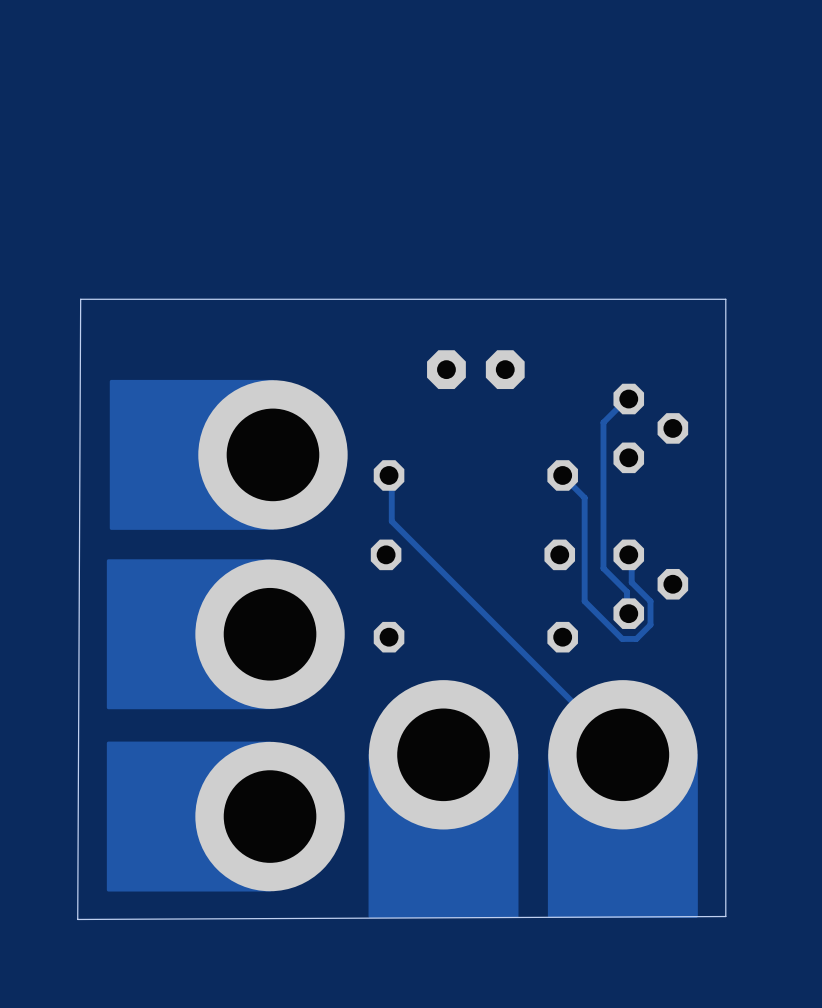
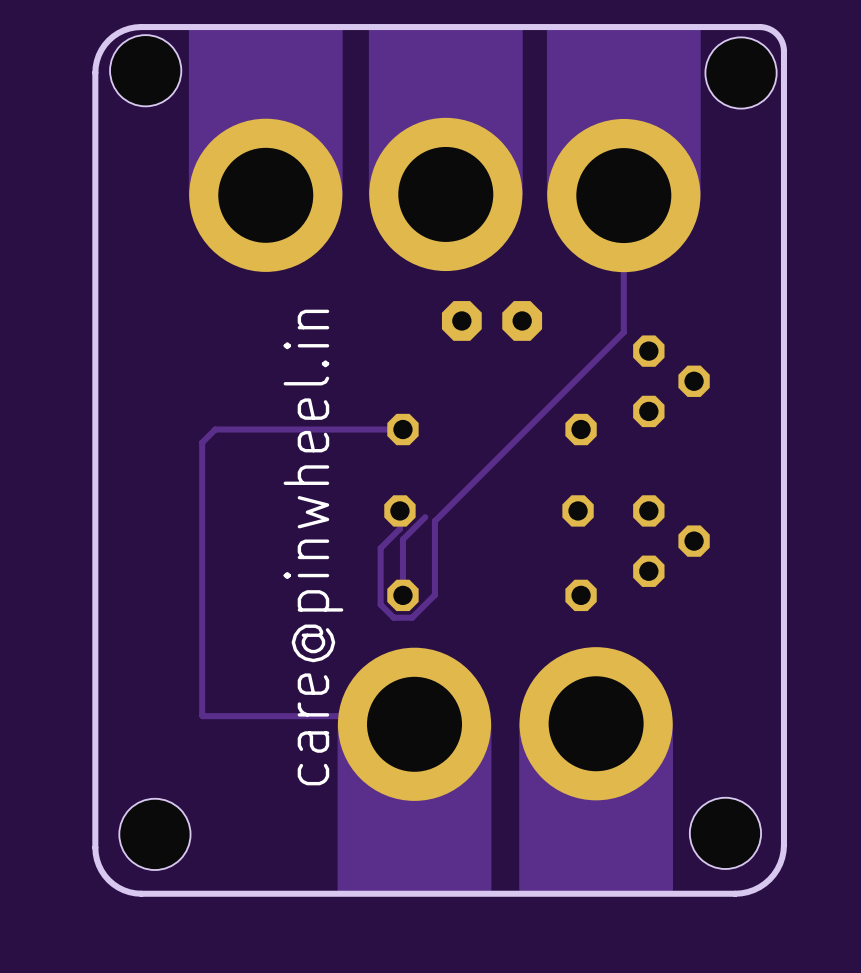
hole: none -> (145, 70)
hole: none -> (741, 72)
part: none -> (265, 149)
part: none -> (445, 149)
part: none -> (623, 150)
track: none -> (623, 195) (623, 332) (434, 521) (434, 594) (412, 617) (393, 617) (380, 604) (380, 548) (399, 528) (399, 510)
board edge: (725, 299) (80, 299) (77, 919) (725, 916) (725, 299) -> (759, 27) (769, 28) (776, 34) (782, 41) (783, 51) (783, 845) (780, 863) (773, 874) (764, 883) (753, 890) (735, 893) (141, 893) (129, 892) (113, 884) (101, 870) (96, 859) (95, 847) (95, 72) (98, 55) (104, 44) (113, 36) (123, 30) (141, 27) (759, 27)
track: (628, 399) (603, 422) (603, 568) (626, 591) (626, 610) (628, 613) -> none
part: (228, 454) -> none
track: (389, 475) (391, 479) (391, 521) (622, 751) (622, 754) -> (402, 429) (215, 429) (202, 442) (202, 715) (345, 716) (353, 724) (414, 724)
track: (562, 475) (584, 497) (584, 601) (622, 638) (636, 638) (650, 624) (650, 601) (631, 582) (631, 558) (628, 554) -> none
track: none -> (425, 517) (402, 539) (402, 595)
text: none -> care@pinwheel.in (313, 547)
part: (225, 634) -> none
part position: (443, 799) -> (414, 769)
part position: (622, 799) -> (596, 769)
part: (225, 816) -> none
hole: none -> (725, 833)
hole: none -> (154, 834)

